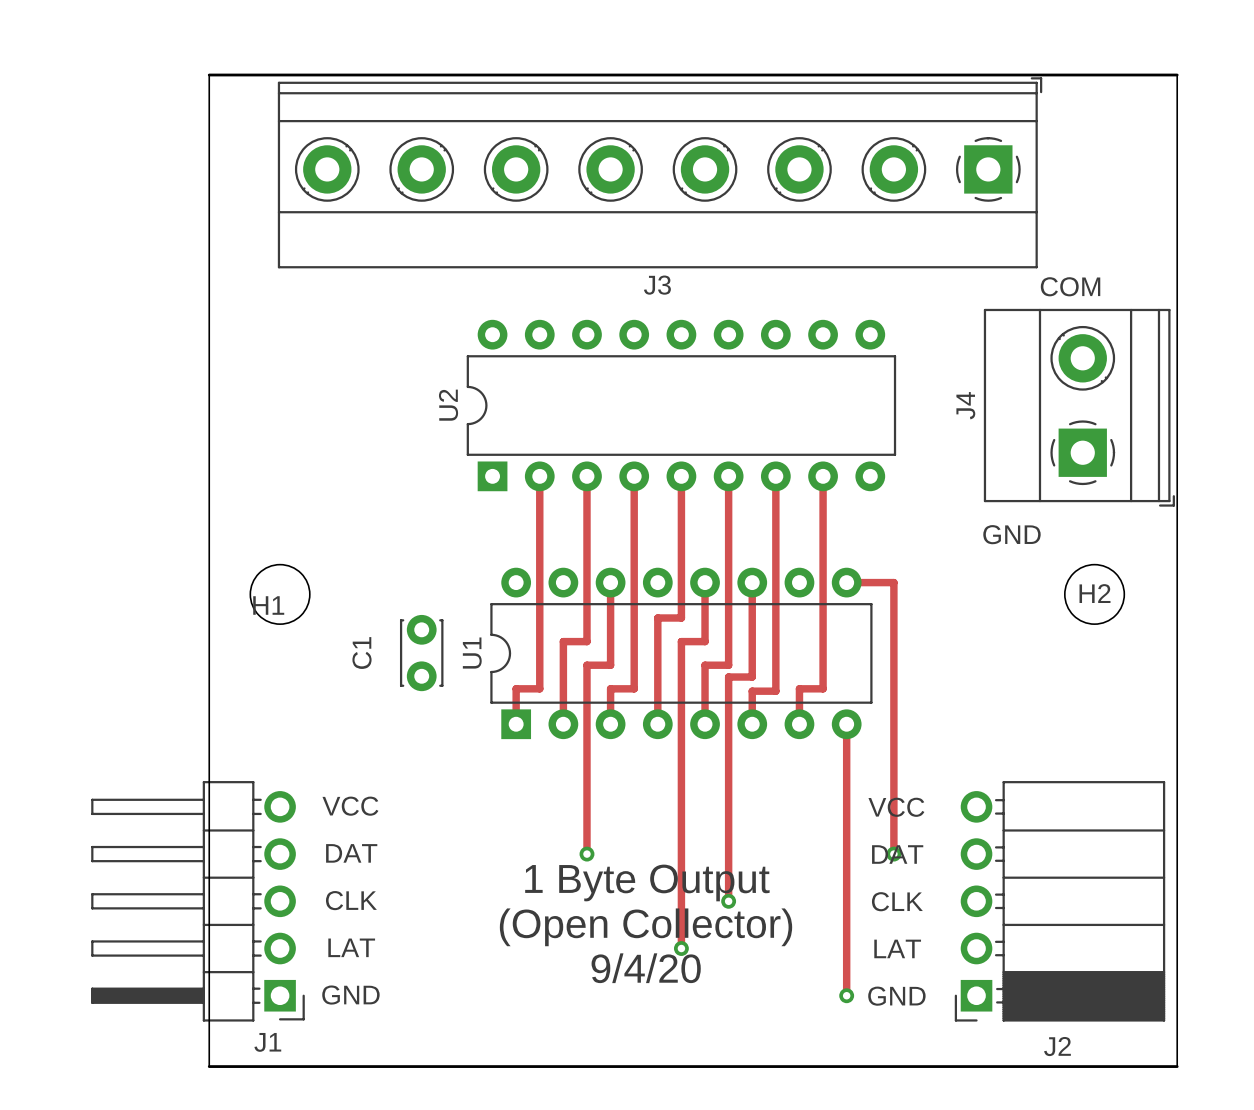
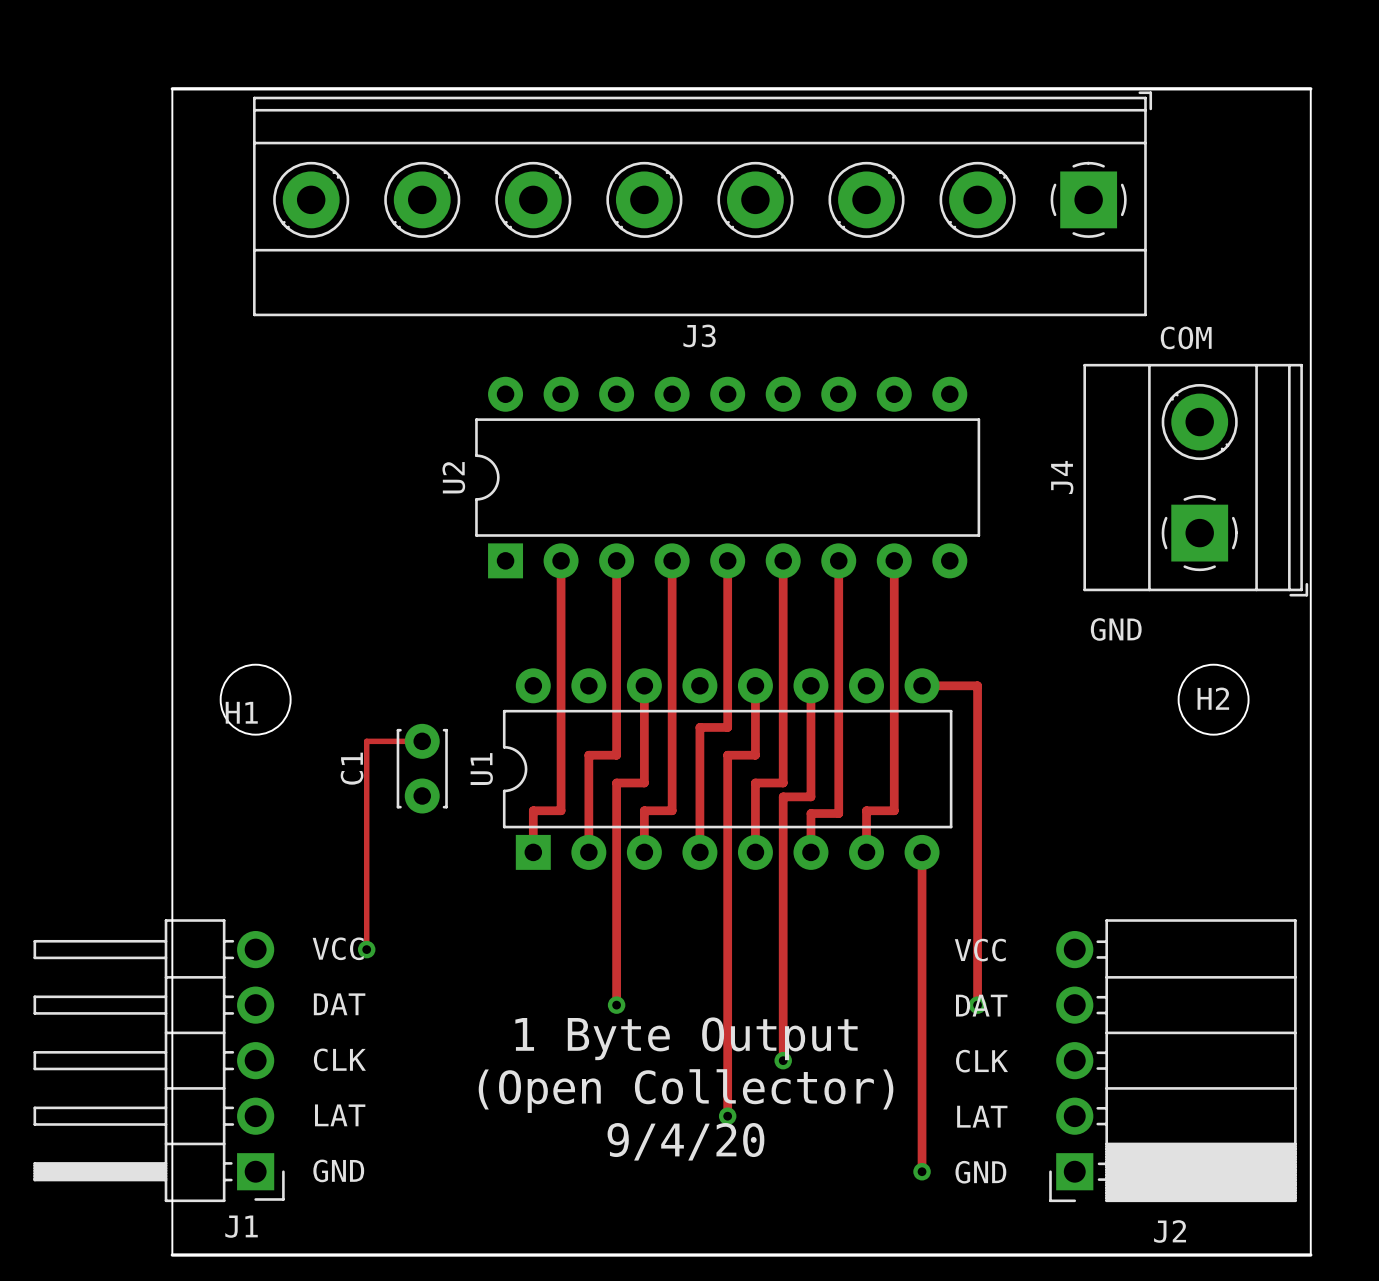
track: none -> (422, 741) (366, 741) (366, 949)
via: none -> (366, 949)

